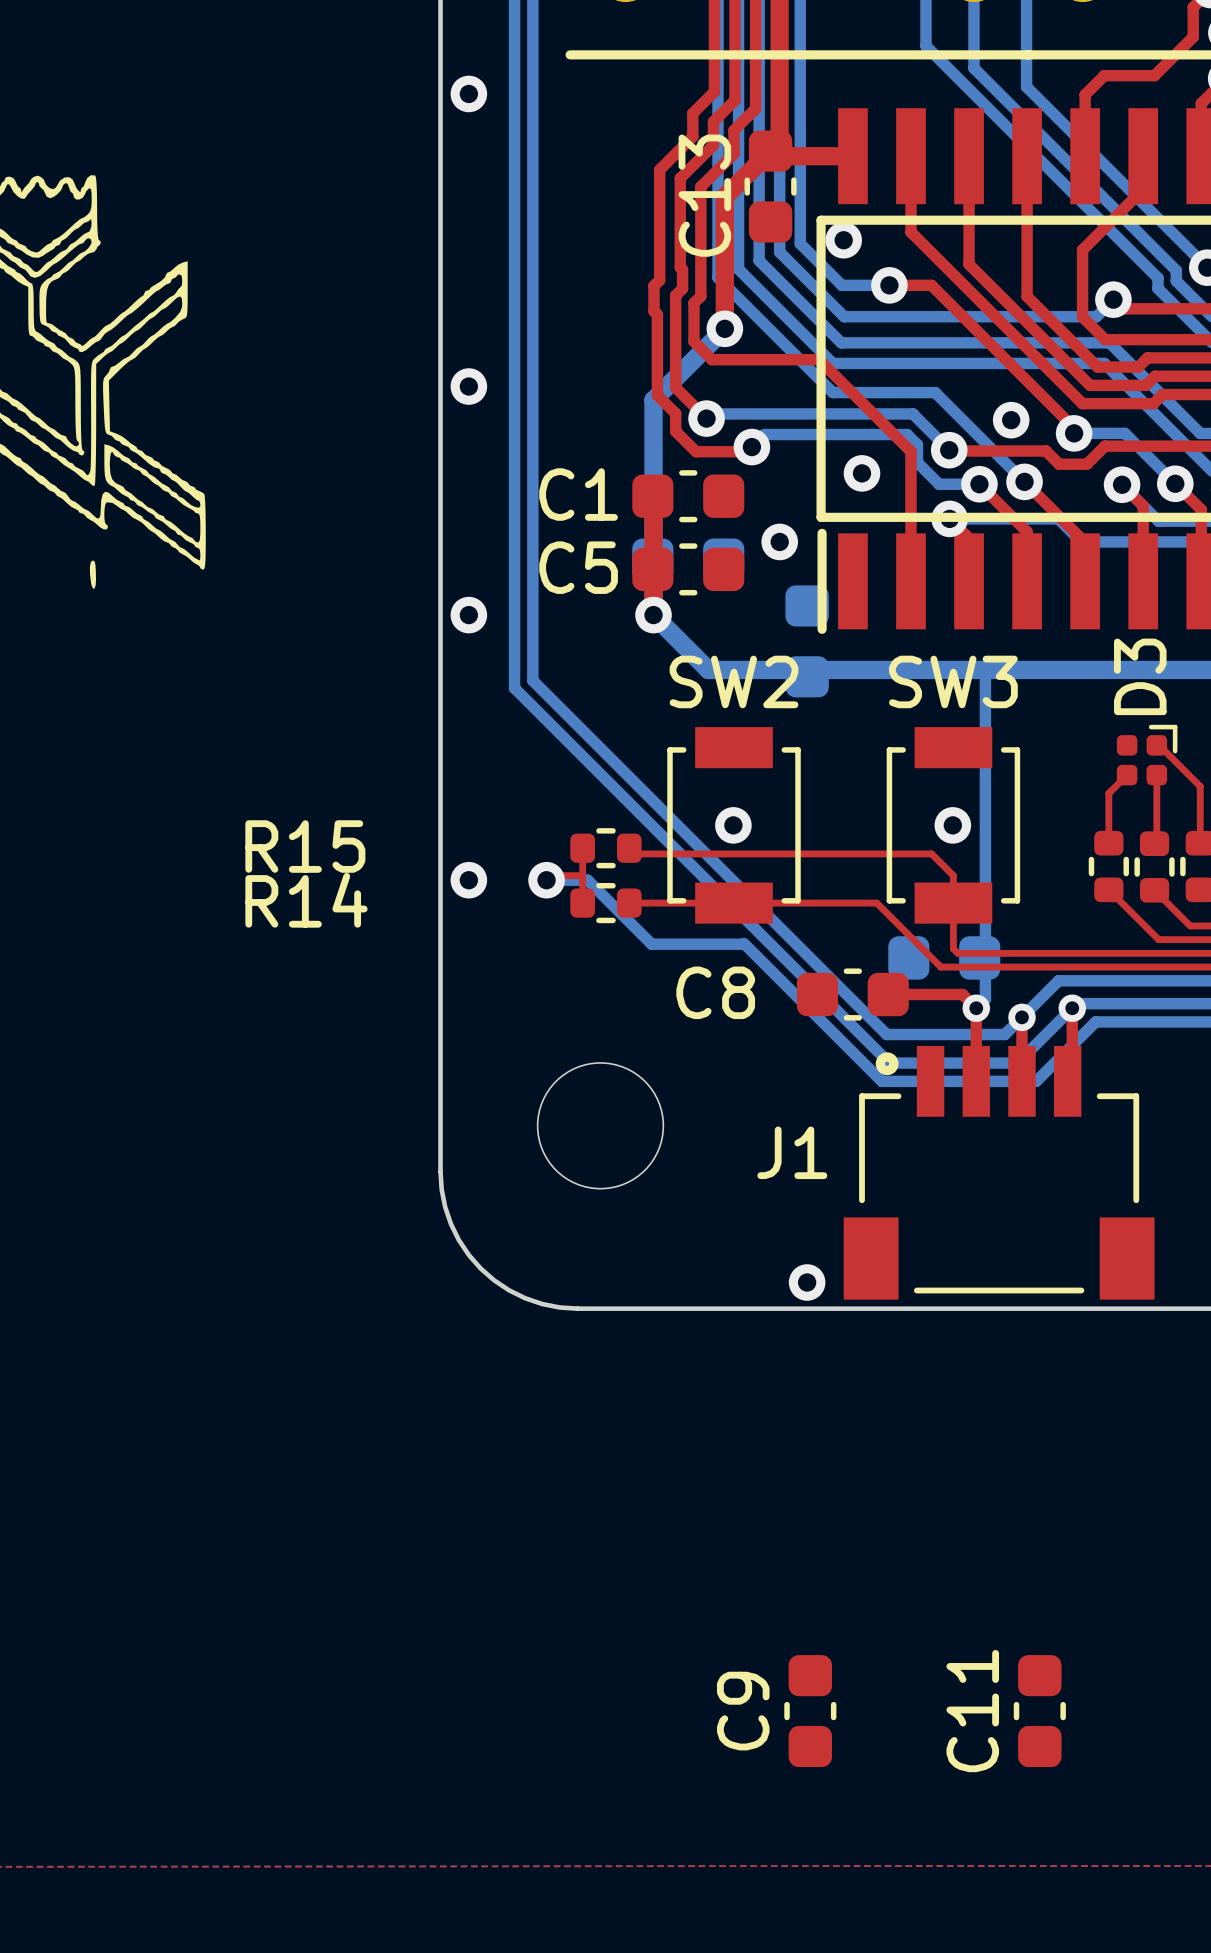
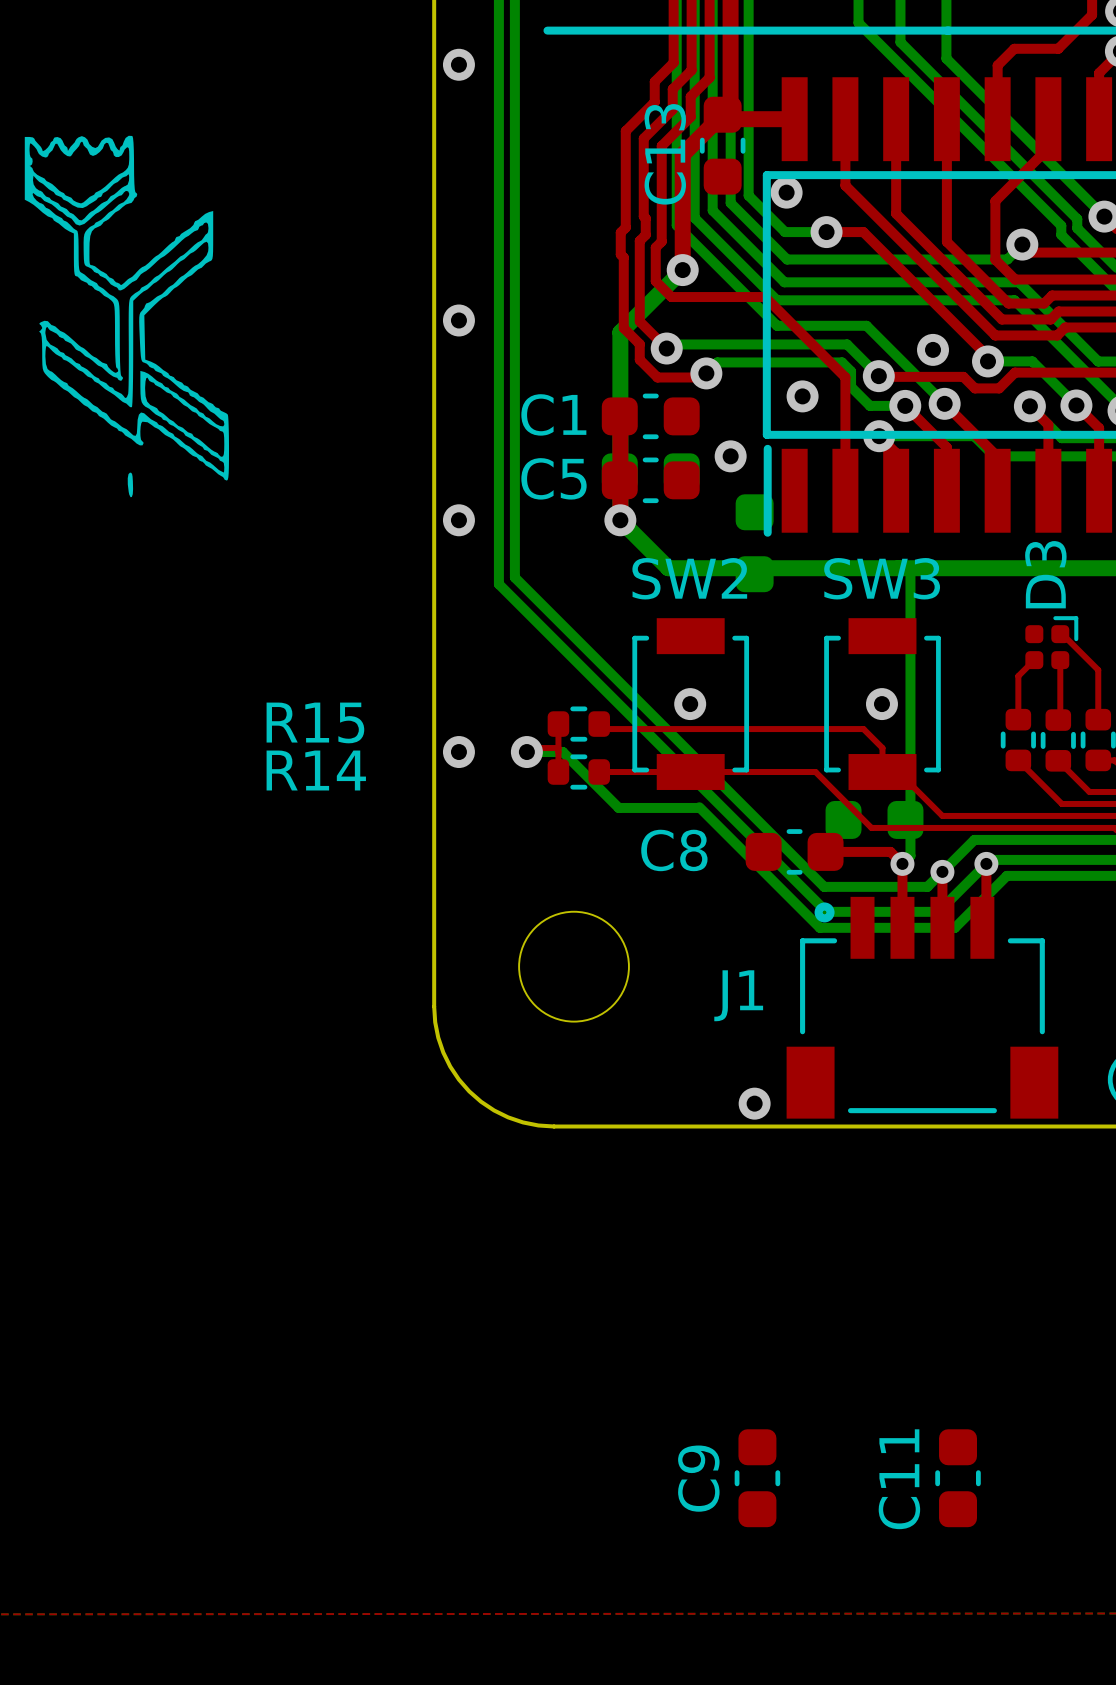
top track: (953, 903) (953, 948) (957, 953) (1021, 953) -> (882, 772) (898, 772) (942, 815)

